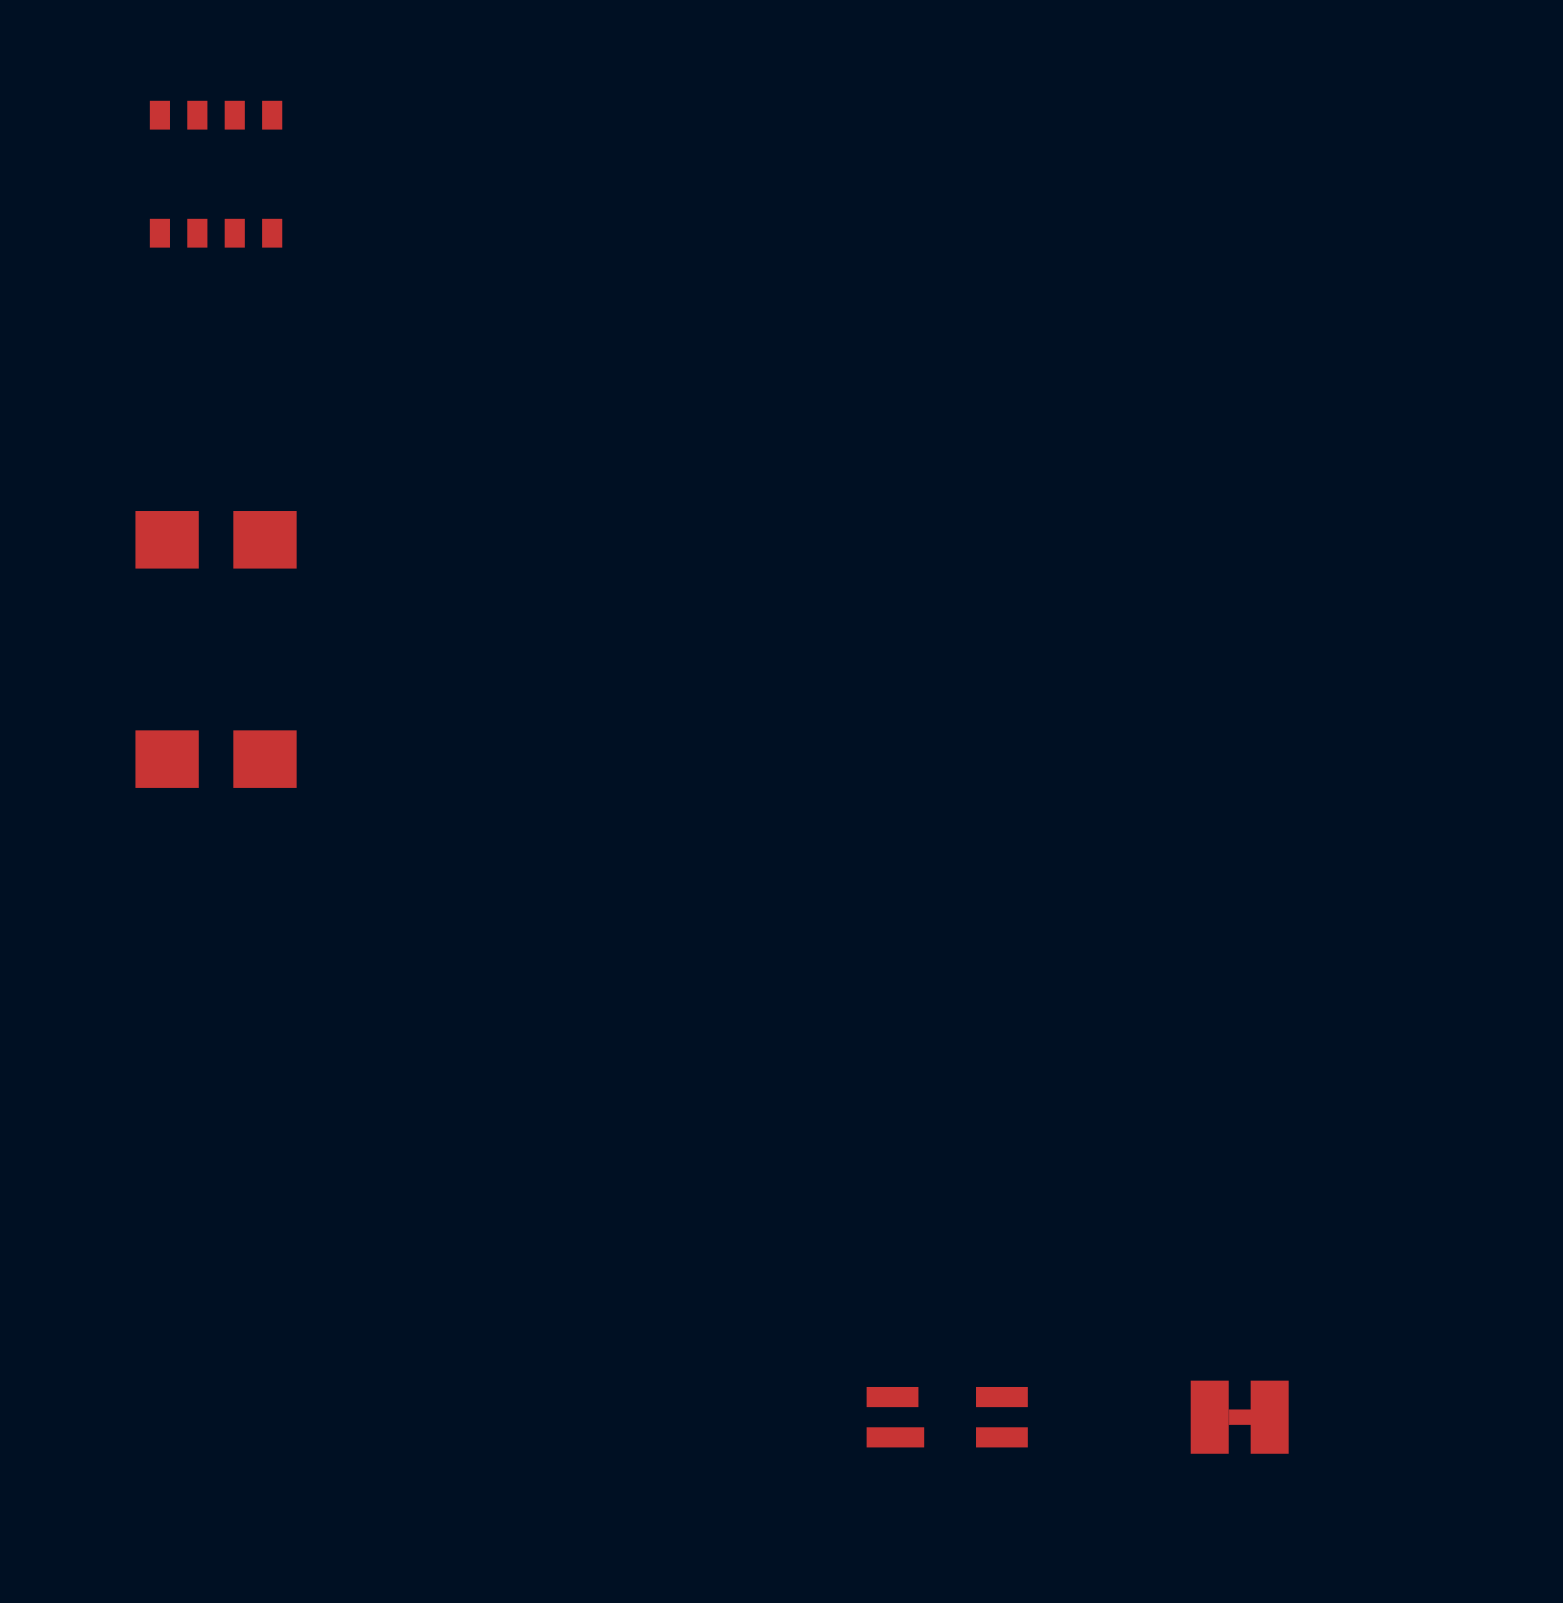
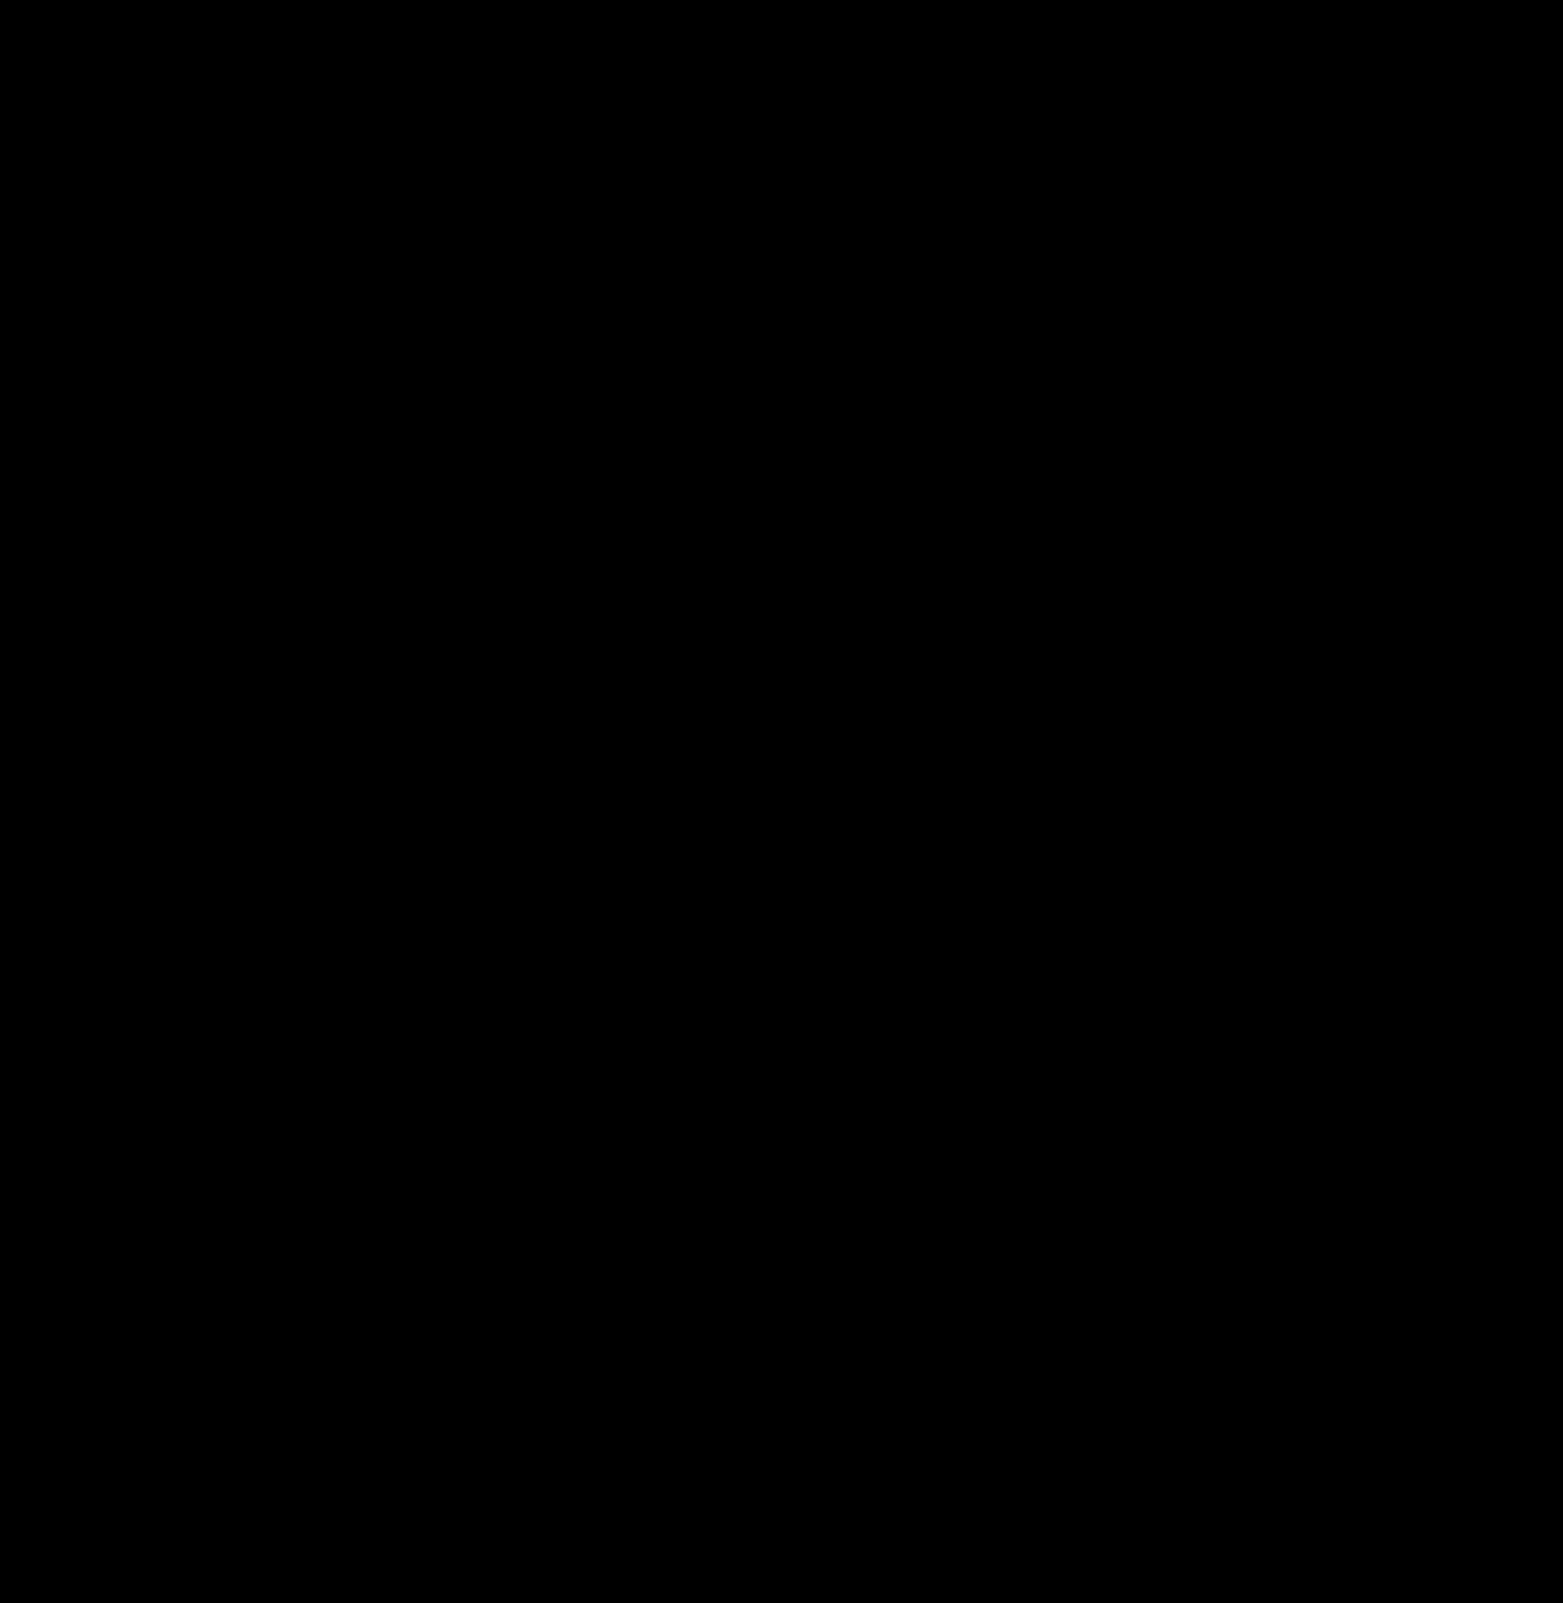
part: (216, 174) -> none
part: (216, 539) -> none
part: (216, 759) -> none
part: (947, 1417) -> none
part: (1239, 1417) -> none

